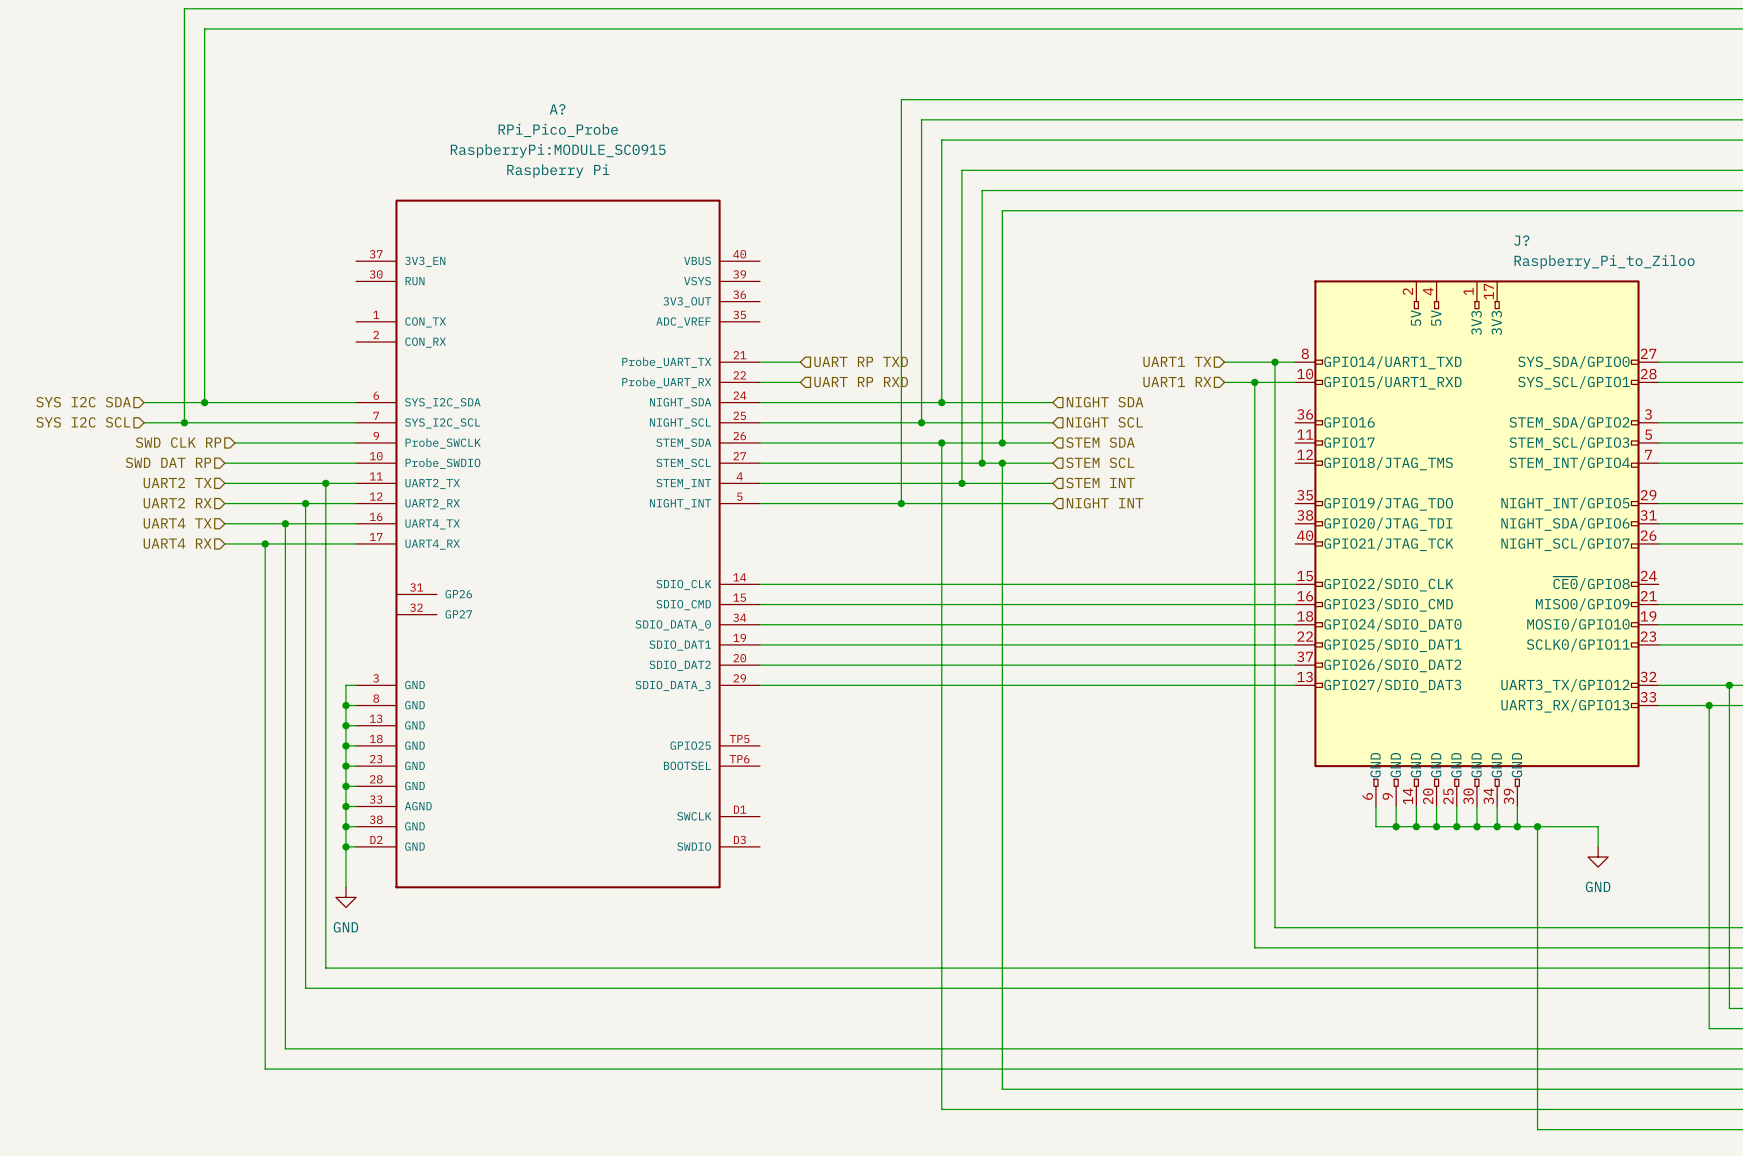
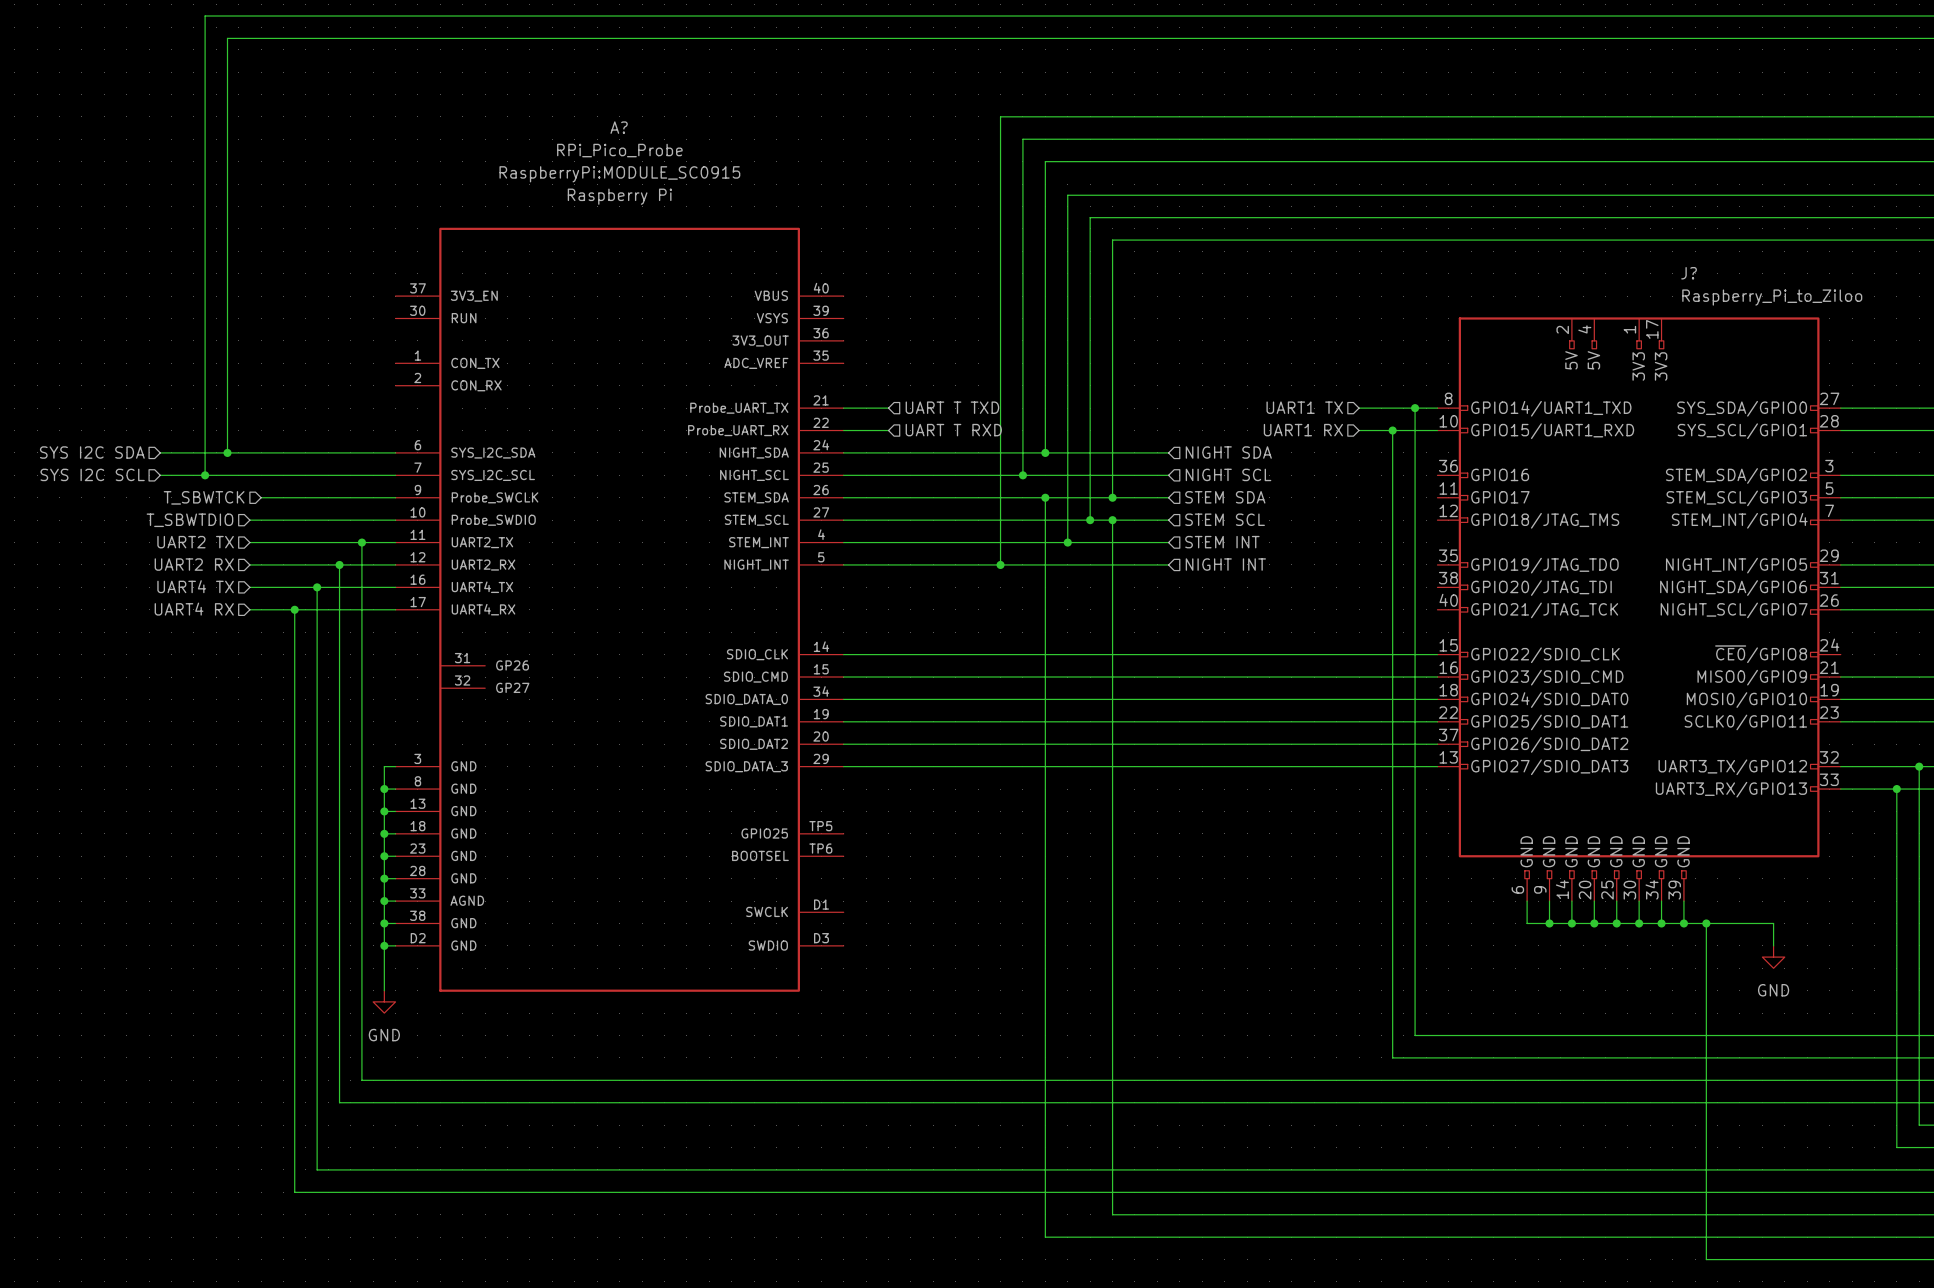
hierarchical label: UART RP TXD (861, 361) -> UART T TXD (952, 407)
hierarchical label: UART RP RXD (861, 382) -> UART T RXD (953, 430)
hierarchical label: SWD CLK RP (178, 442) -> T_SBWTCK (204, 497)
hierarchical label: SWD DAT RP (168, 462) -> T_SBWTDIO (189, 520)

